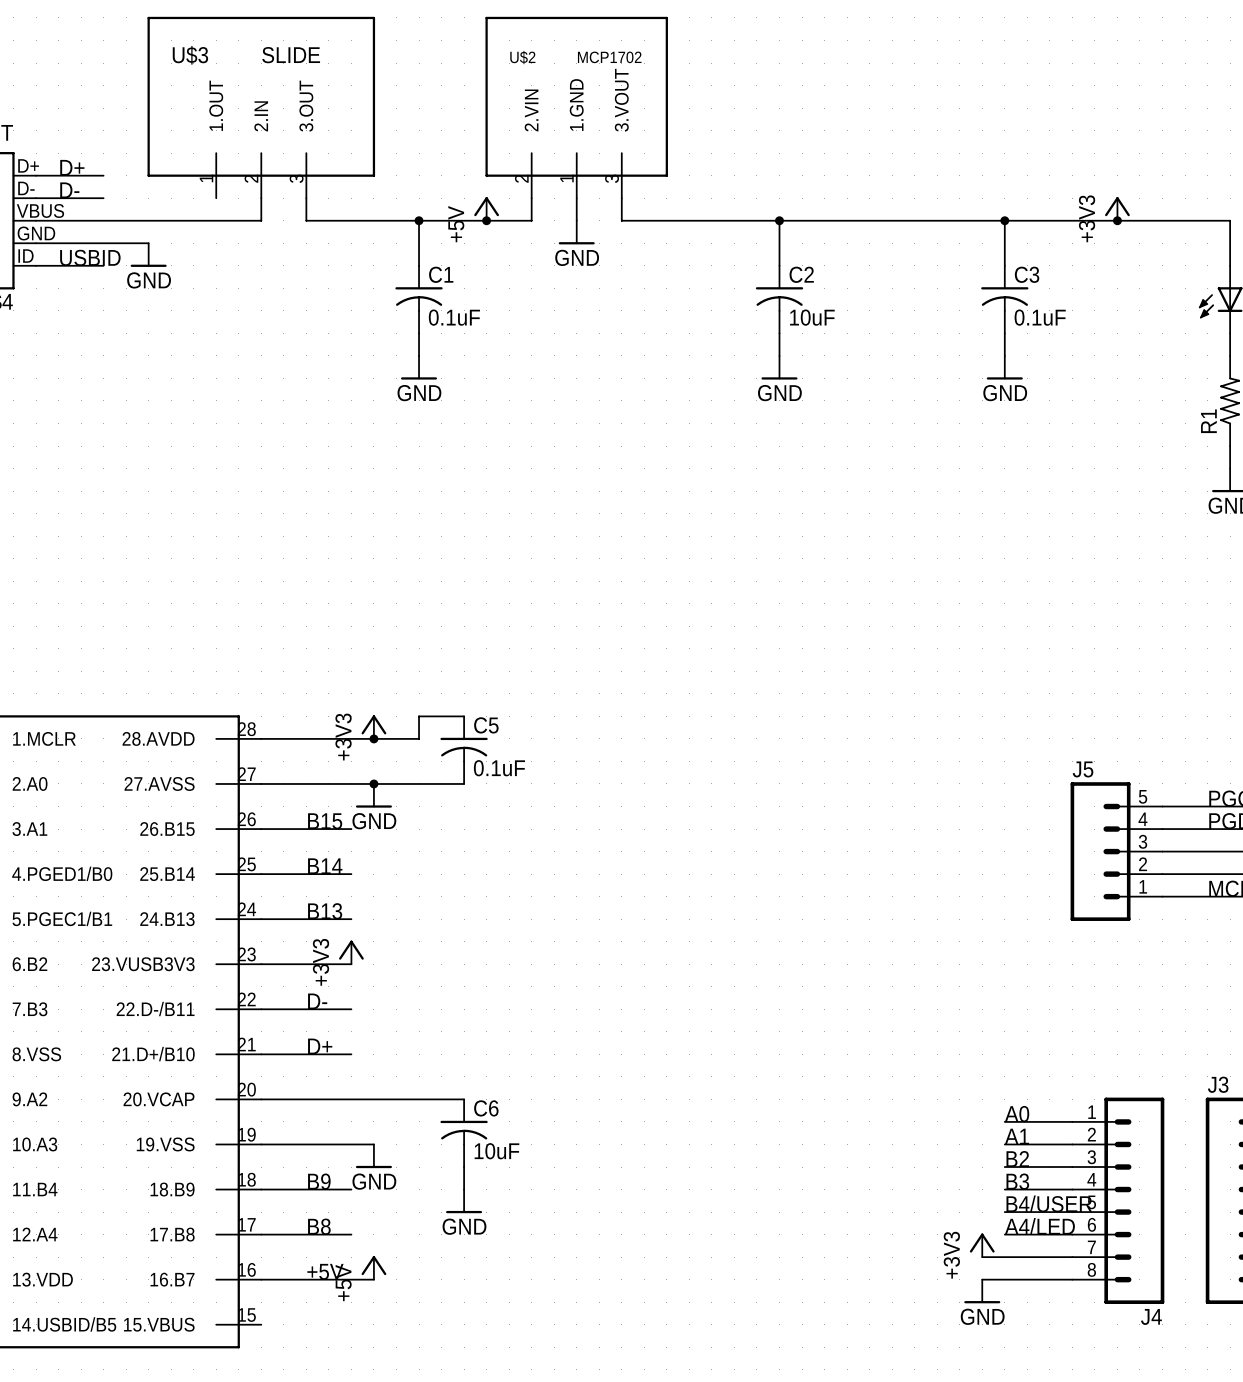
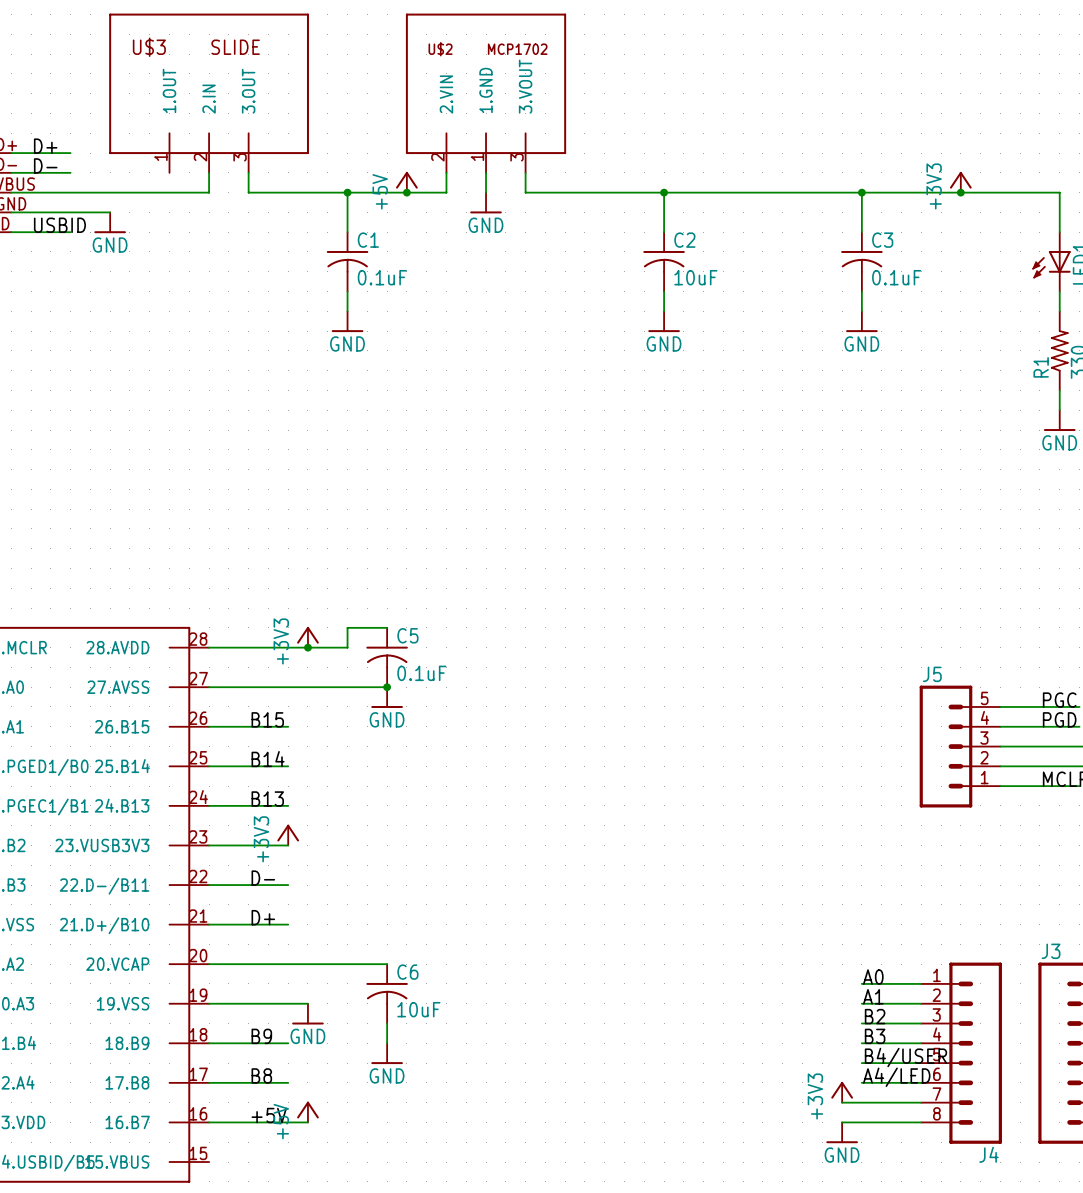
junction: (373, 783) -> none
junction: none -> (387, 687)
power symbol position: GND (373, 795) -> GND (387, 697)

